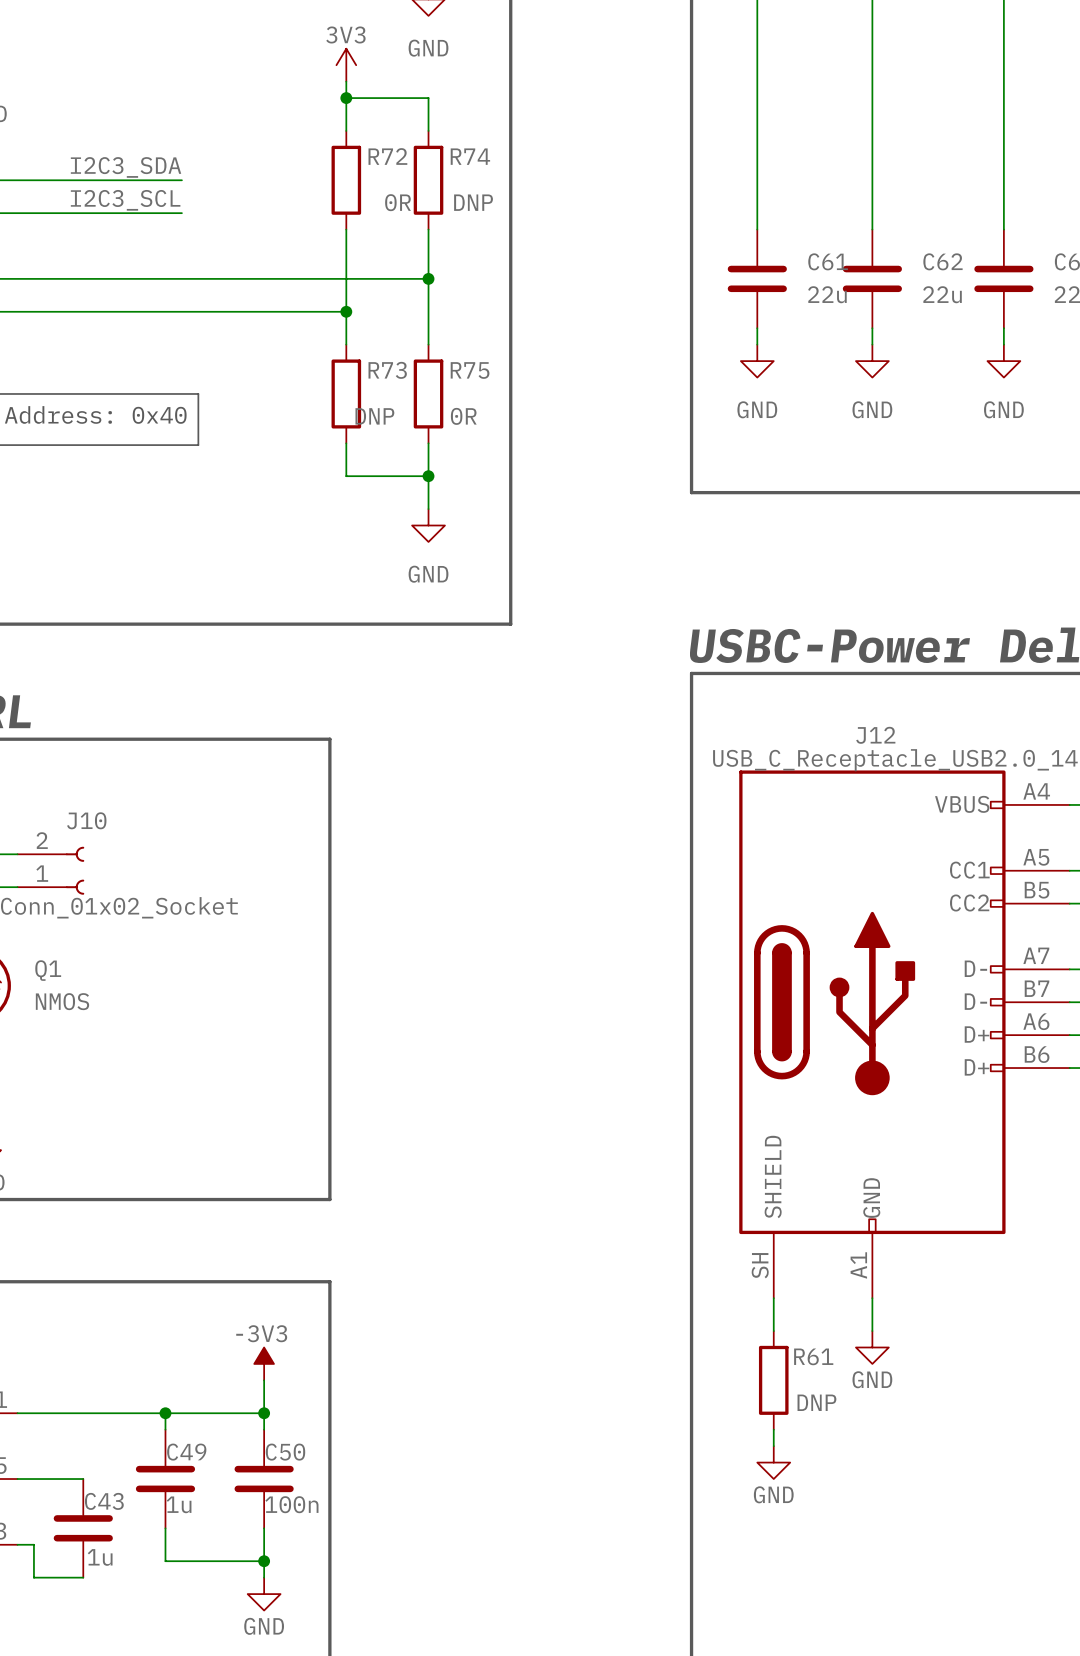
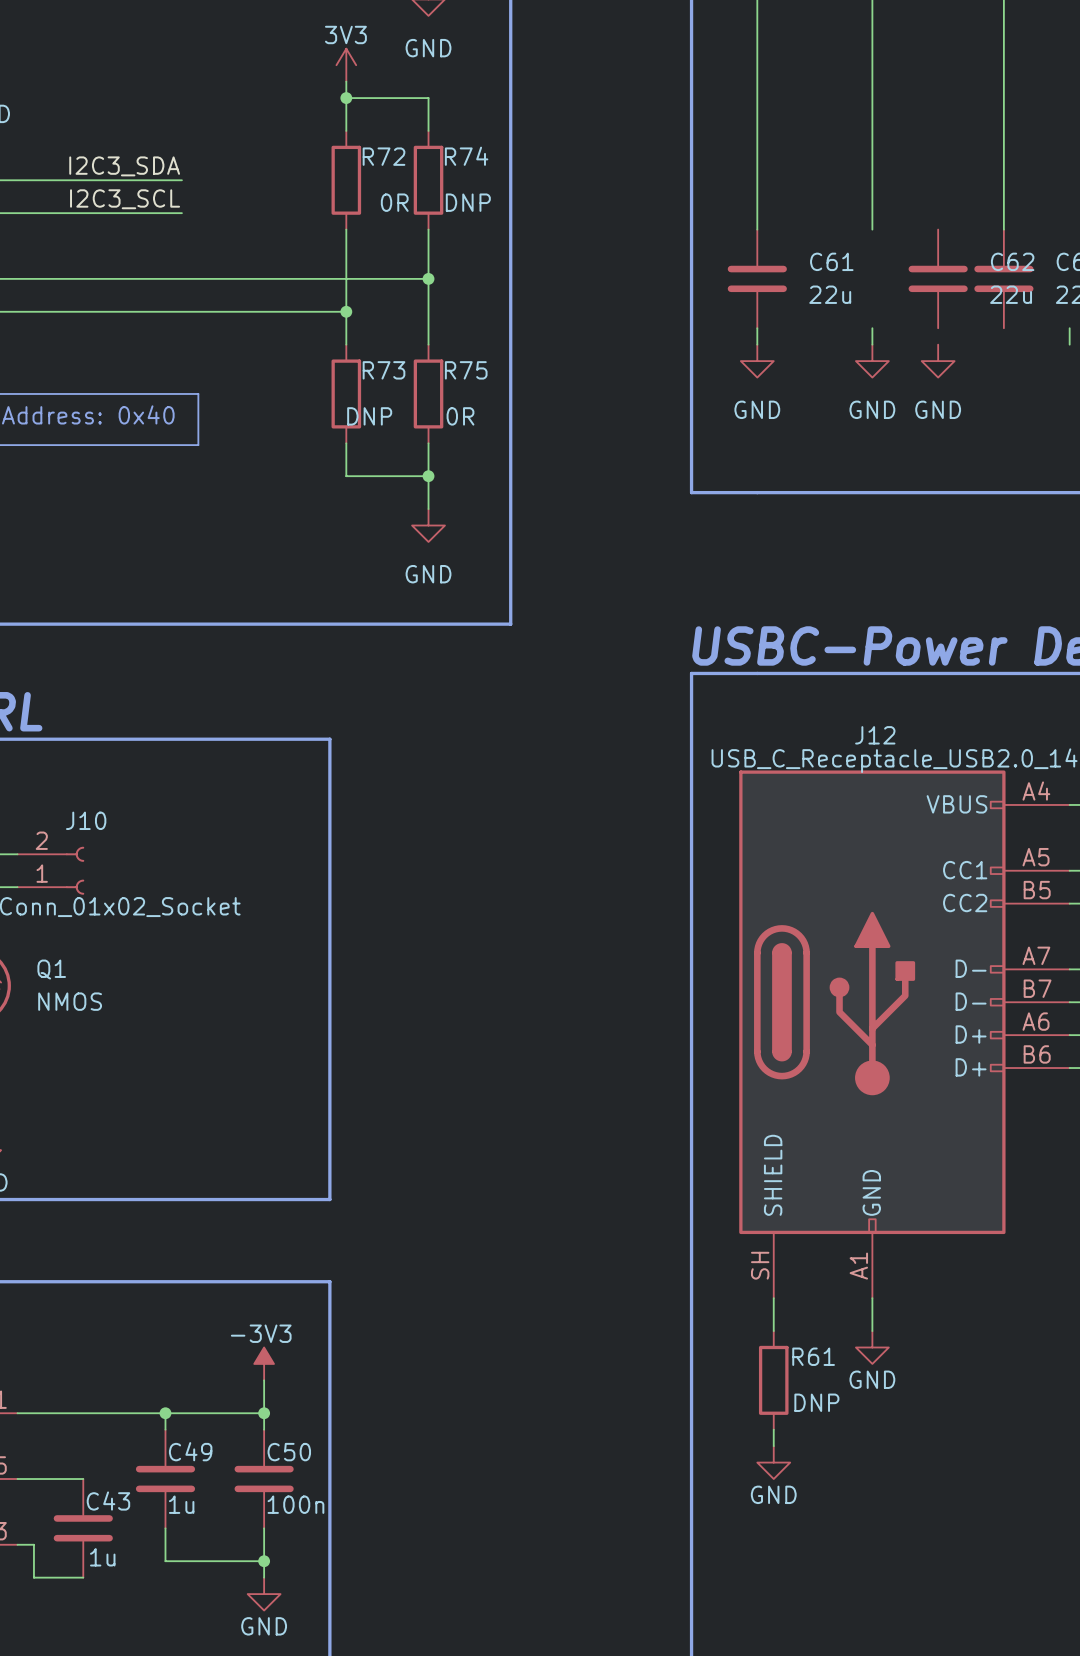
C62 position: (872, 278) -> (938, 278)
wire: (1003, 328) (1003, 344) -> (1069, 328) (1069, 344)
power symbol position: GND (1003, 361) -> GND (938, 361)

